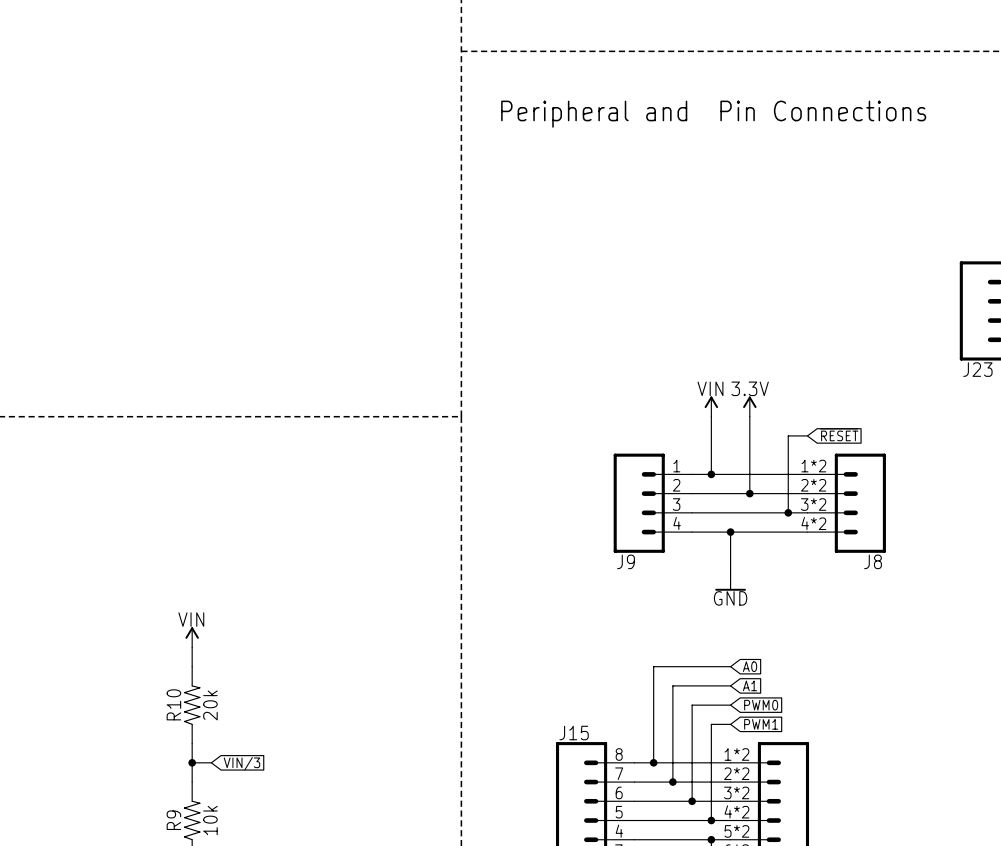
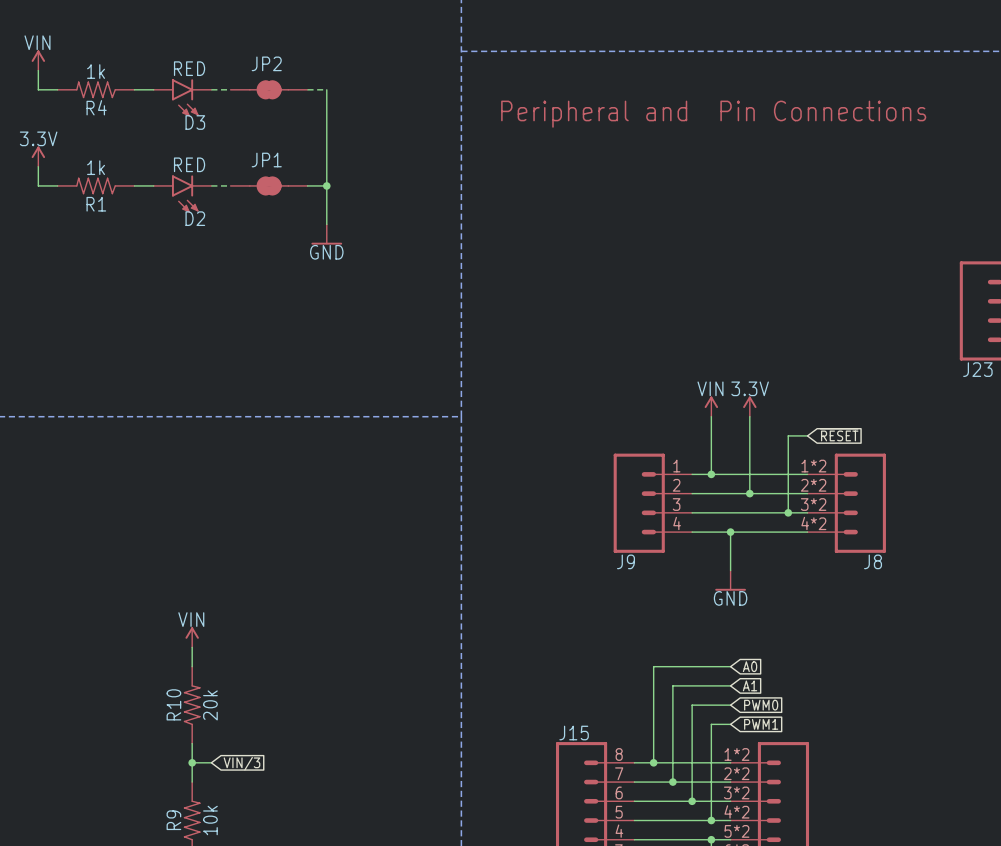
power symbol: none -> VIN (38, 60)
wire: none -> (38, 70) (38, 89) (57, 89)
R4: none -> 1k (96, 89)
wire: none -> (134, 89) (153, 89)
wire: none -> (211, 89) (230, 89)
JP2: none -> (269, 89)
wire: none -> (307, 89) (326, 89) (326, 224)
D3: none -> RED (182, 97)
power symbol: none -> 3.3V (38, 156)
wire: none -> (38, 166) (38, 185) (57, 185)
R1: none -> 1k (96, 185)
wire: none -> (134, 185) (153, 185)
wire: none -> (211, 185) (230, 185)
JP1: none -> (269, 185)
wire: none -> (307, 185) (326, 185)
junction: none -> (326, 185)
D2: none -> RED (182, 193)
power symbol: none -> GND (326, 234)

